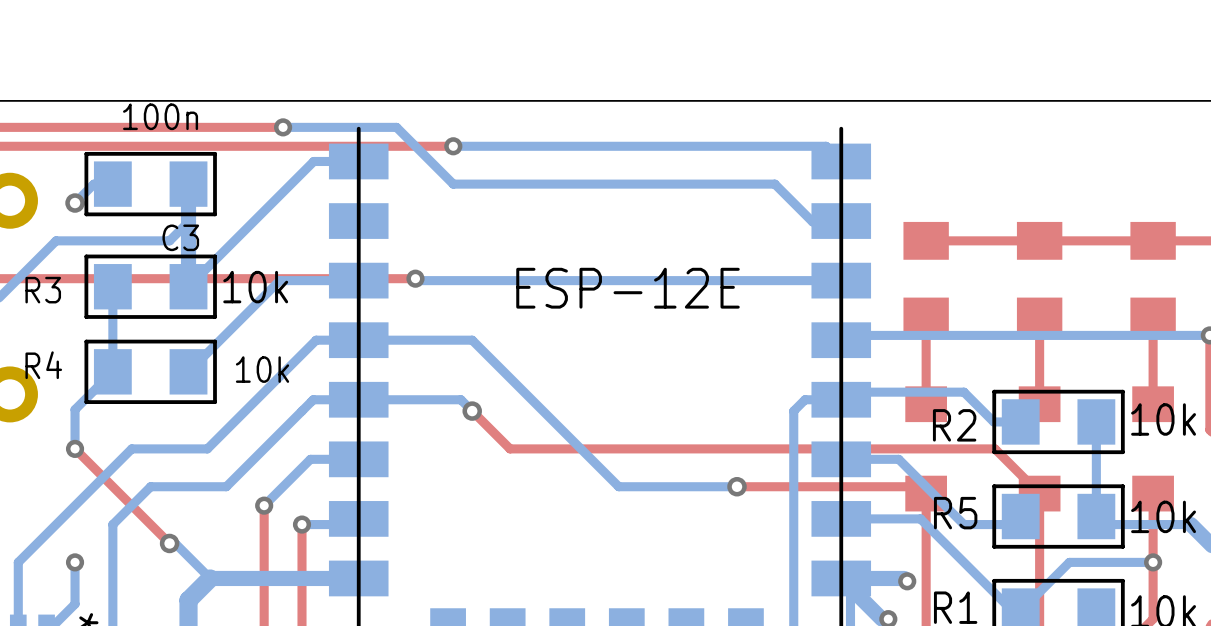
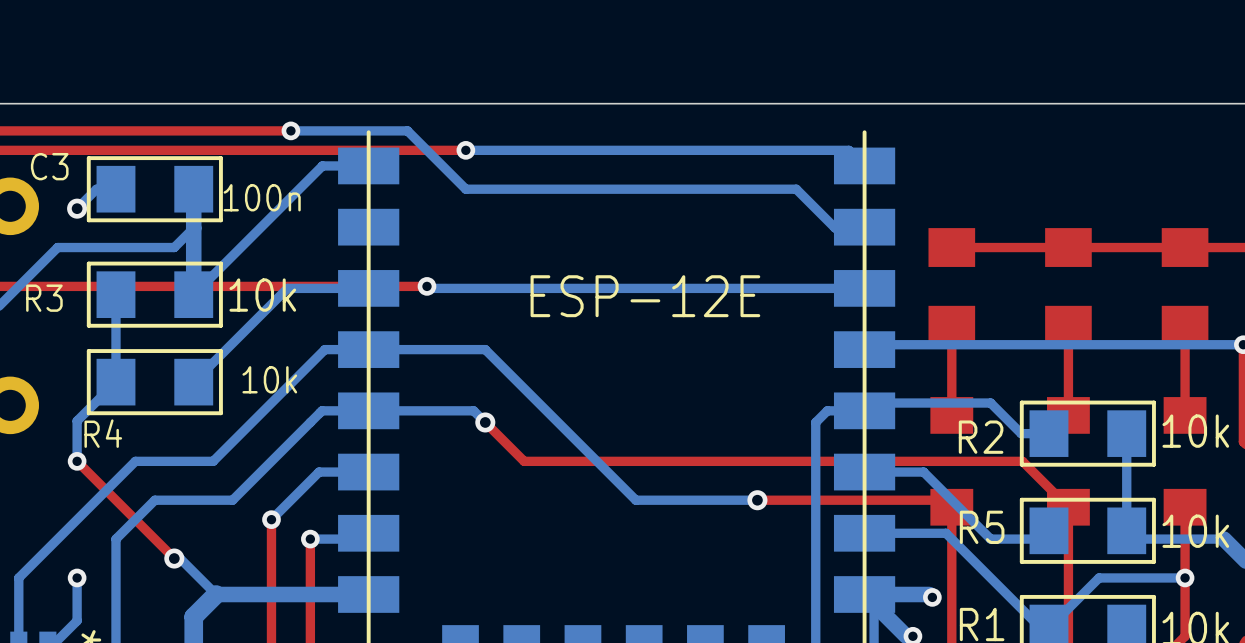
C3 value position: 100n (160, 116) -> 100n (262, 197)
C3 name position: C3 (180, 237) -> C3 (49, 166)
R4 name position: R4 (43, 365) -> R4 (103, 433)

